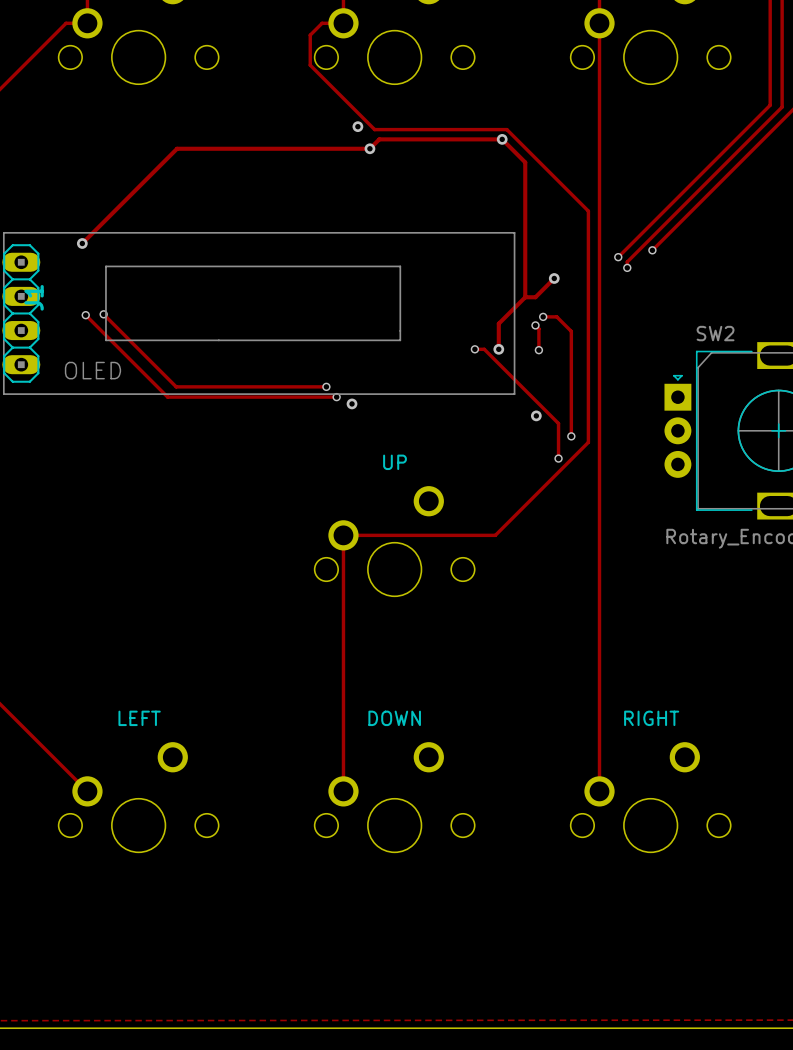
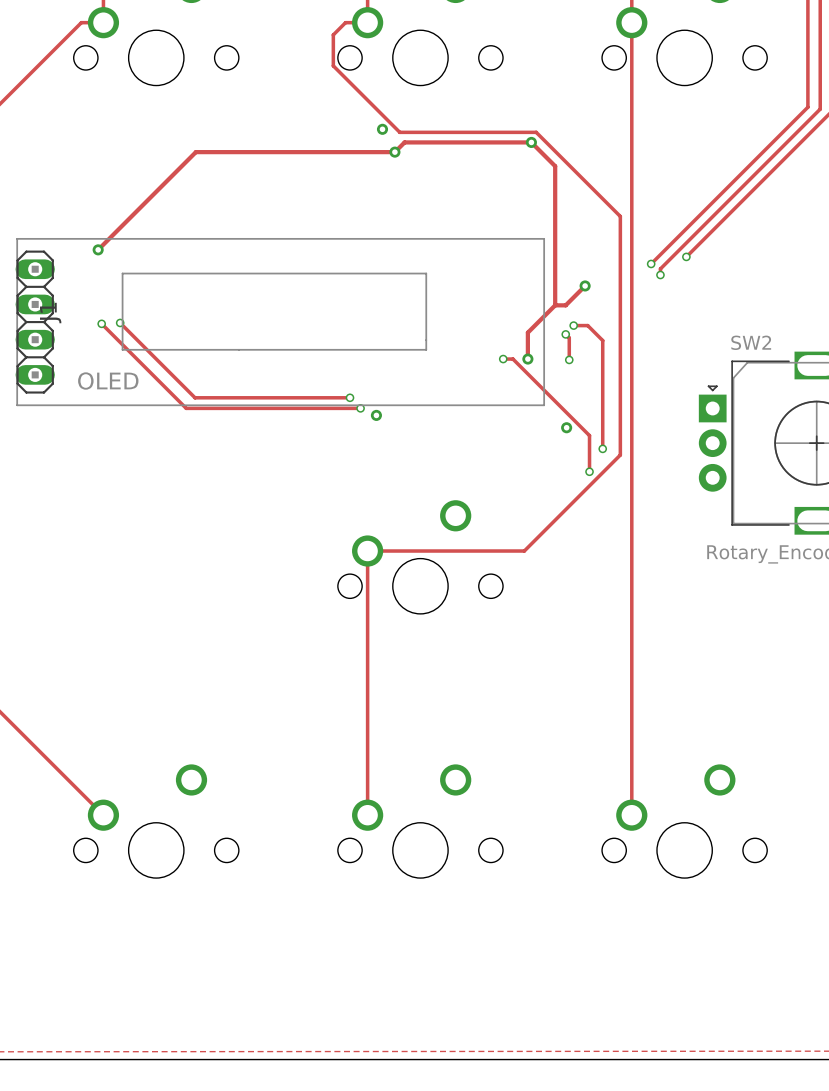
part value: UP (395, 462) -> none
part value: LEFT (139, 718) -> none
part value: DOWN (394, 718) -> none
part value: RIGHT (651, 718) -> none

